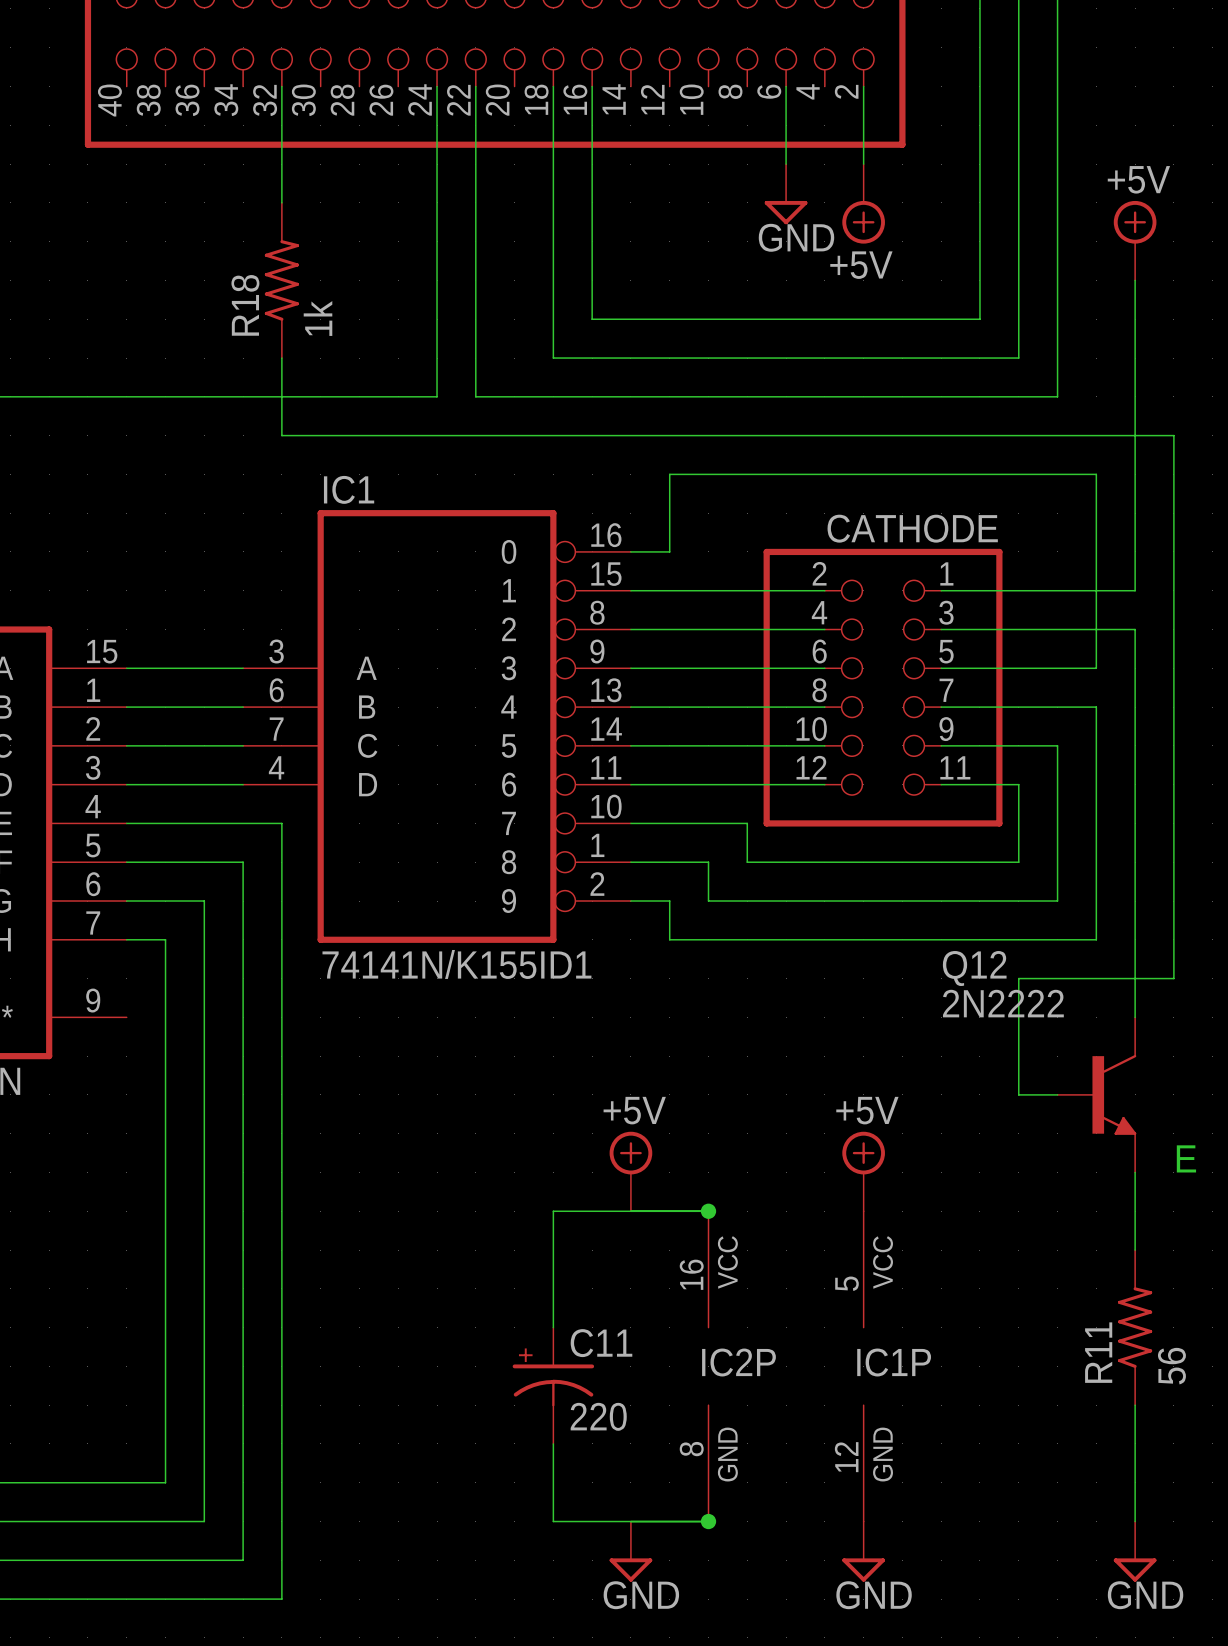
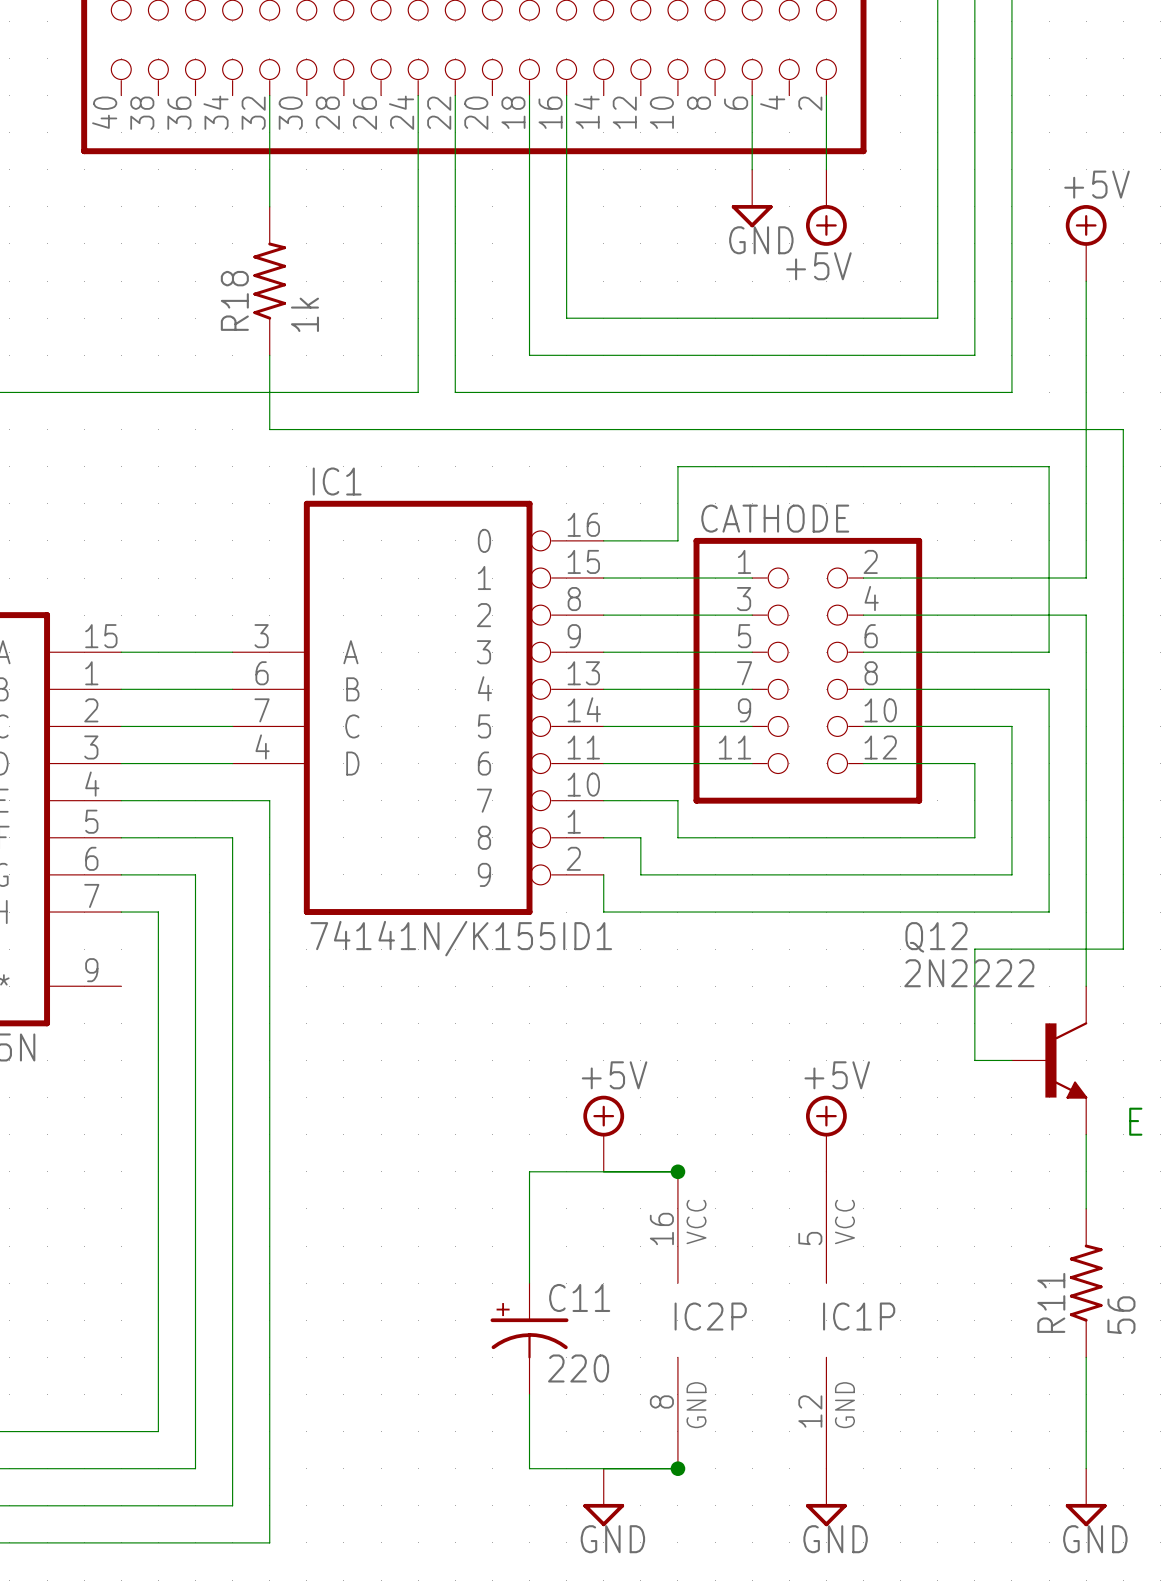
wire: (708, 474) (669, 474) (669, 551) -> (677, 466) (677, 540) (640, 540)
wire: (786, 590) (824, 590) -> (863, 578) (900, 578)
wire: (786, 629) (824, 629) -> (863, 615) (900, 615)
wire: (786, 668) (824, 668) -> (863, 652) (900, 652)
CATHODE: none -> (807, 670)
CATHODE: (883, 687) -> none
wire: (786, 707) (824, 707) -> (863, 689) (900, 689)
wire: (786, 745) (824, 745) -> (863, 726) (900, 726)
wire: (786, 784) (824, 784) -> (863, 763) (900, 763)
wire: (708, 823) (747, 823) (747, 862) -> (677, 800) (677, 837) (715, 837)
wire: (669, 862) (708, 862) (708, 901) -> (640, 837) (640, 874) (677, 874)
wire: (630, 901) (669, 901) (669, 939) -> (603, 874) (603, 912) (640, 912)

